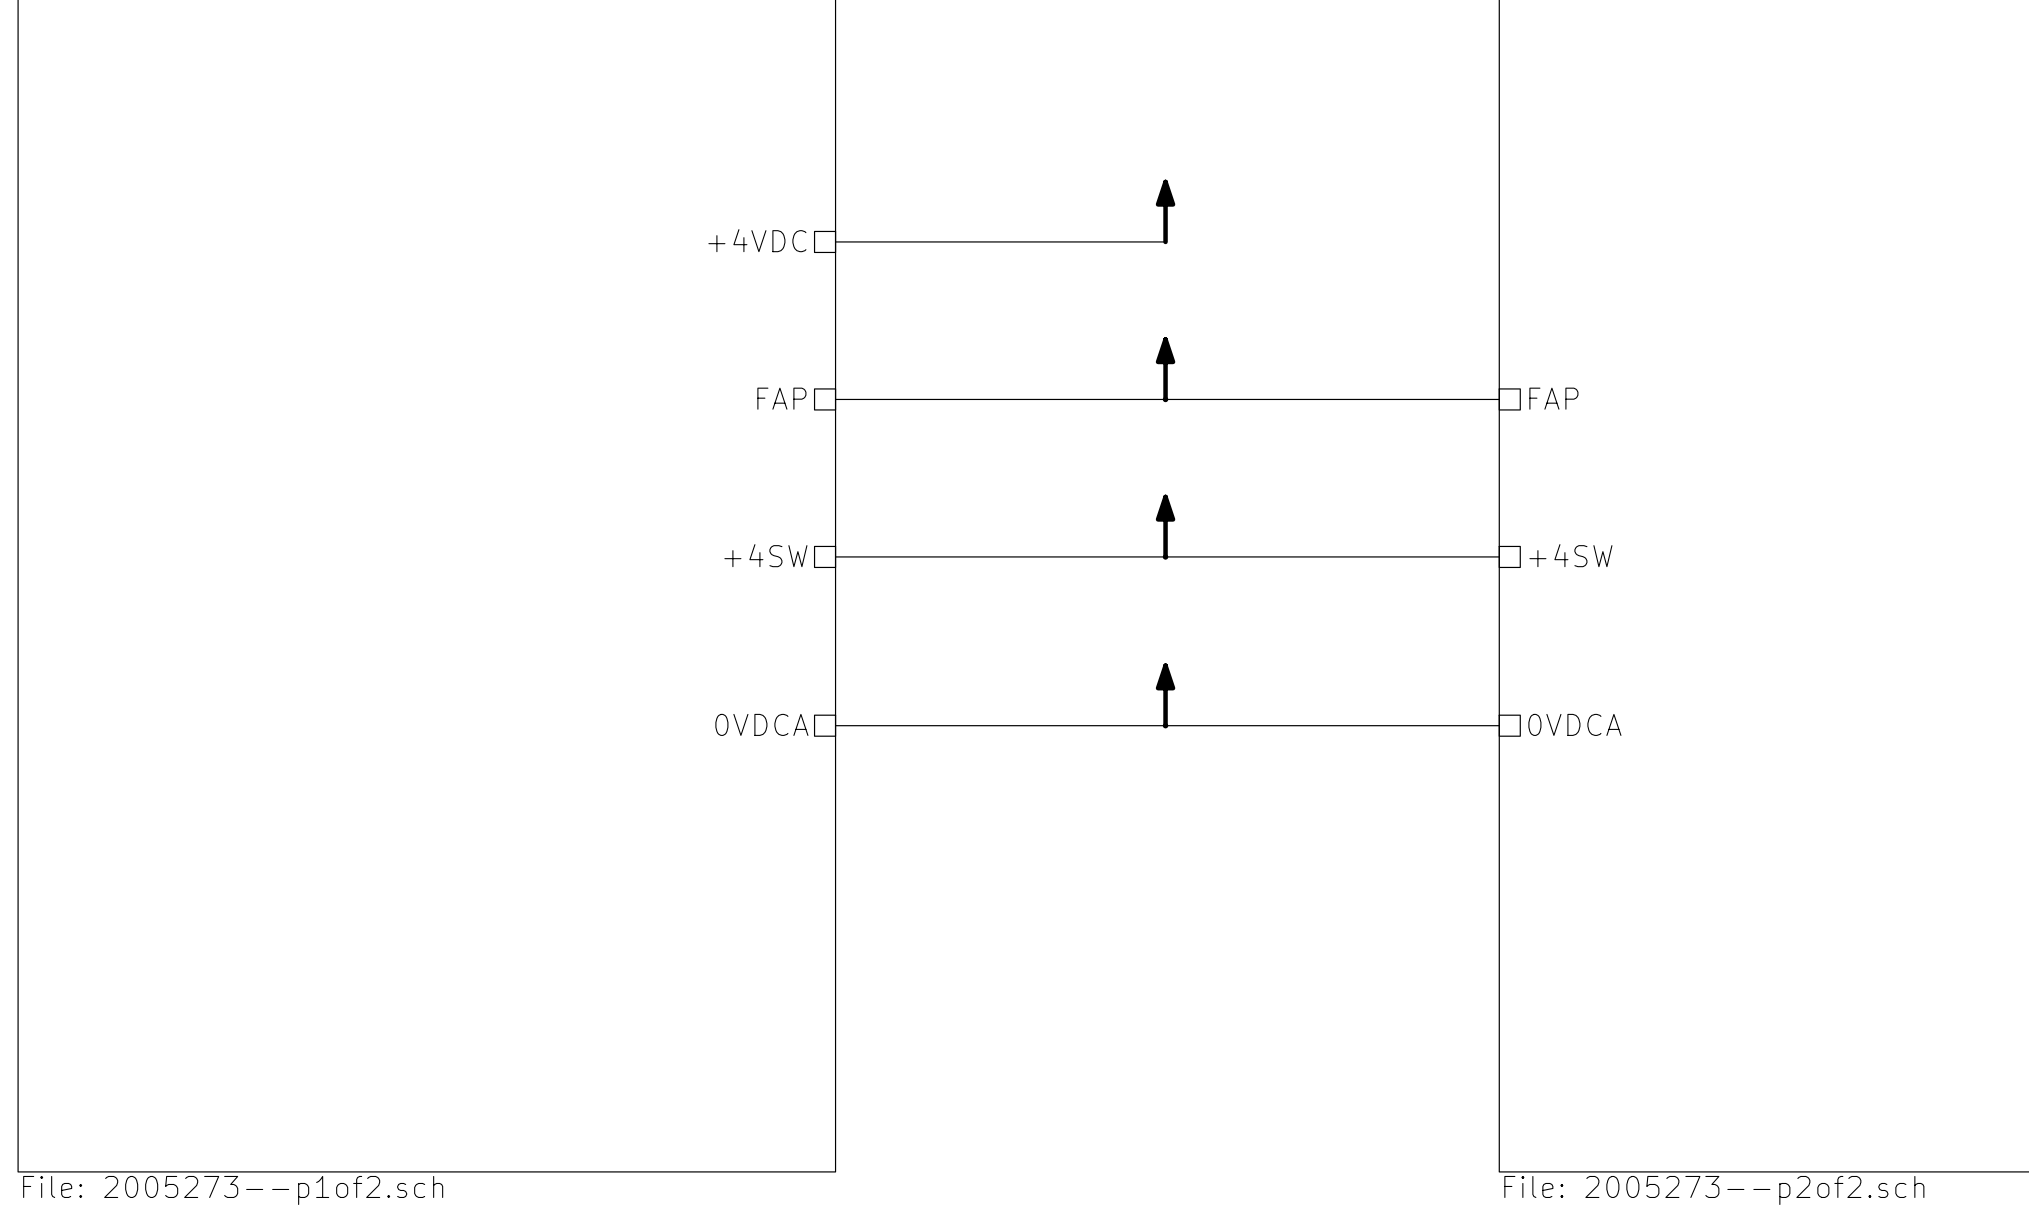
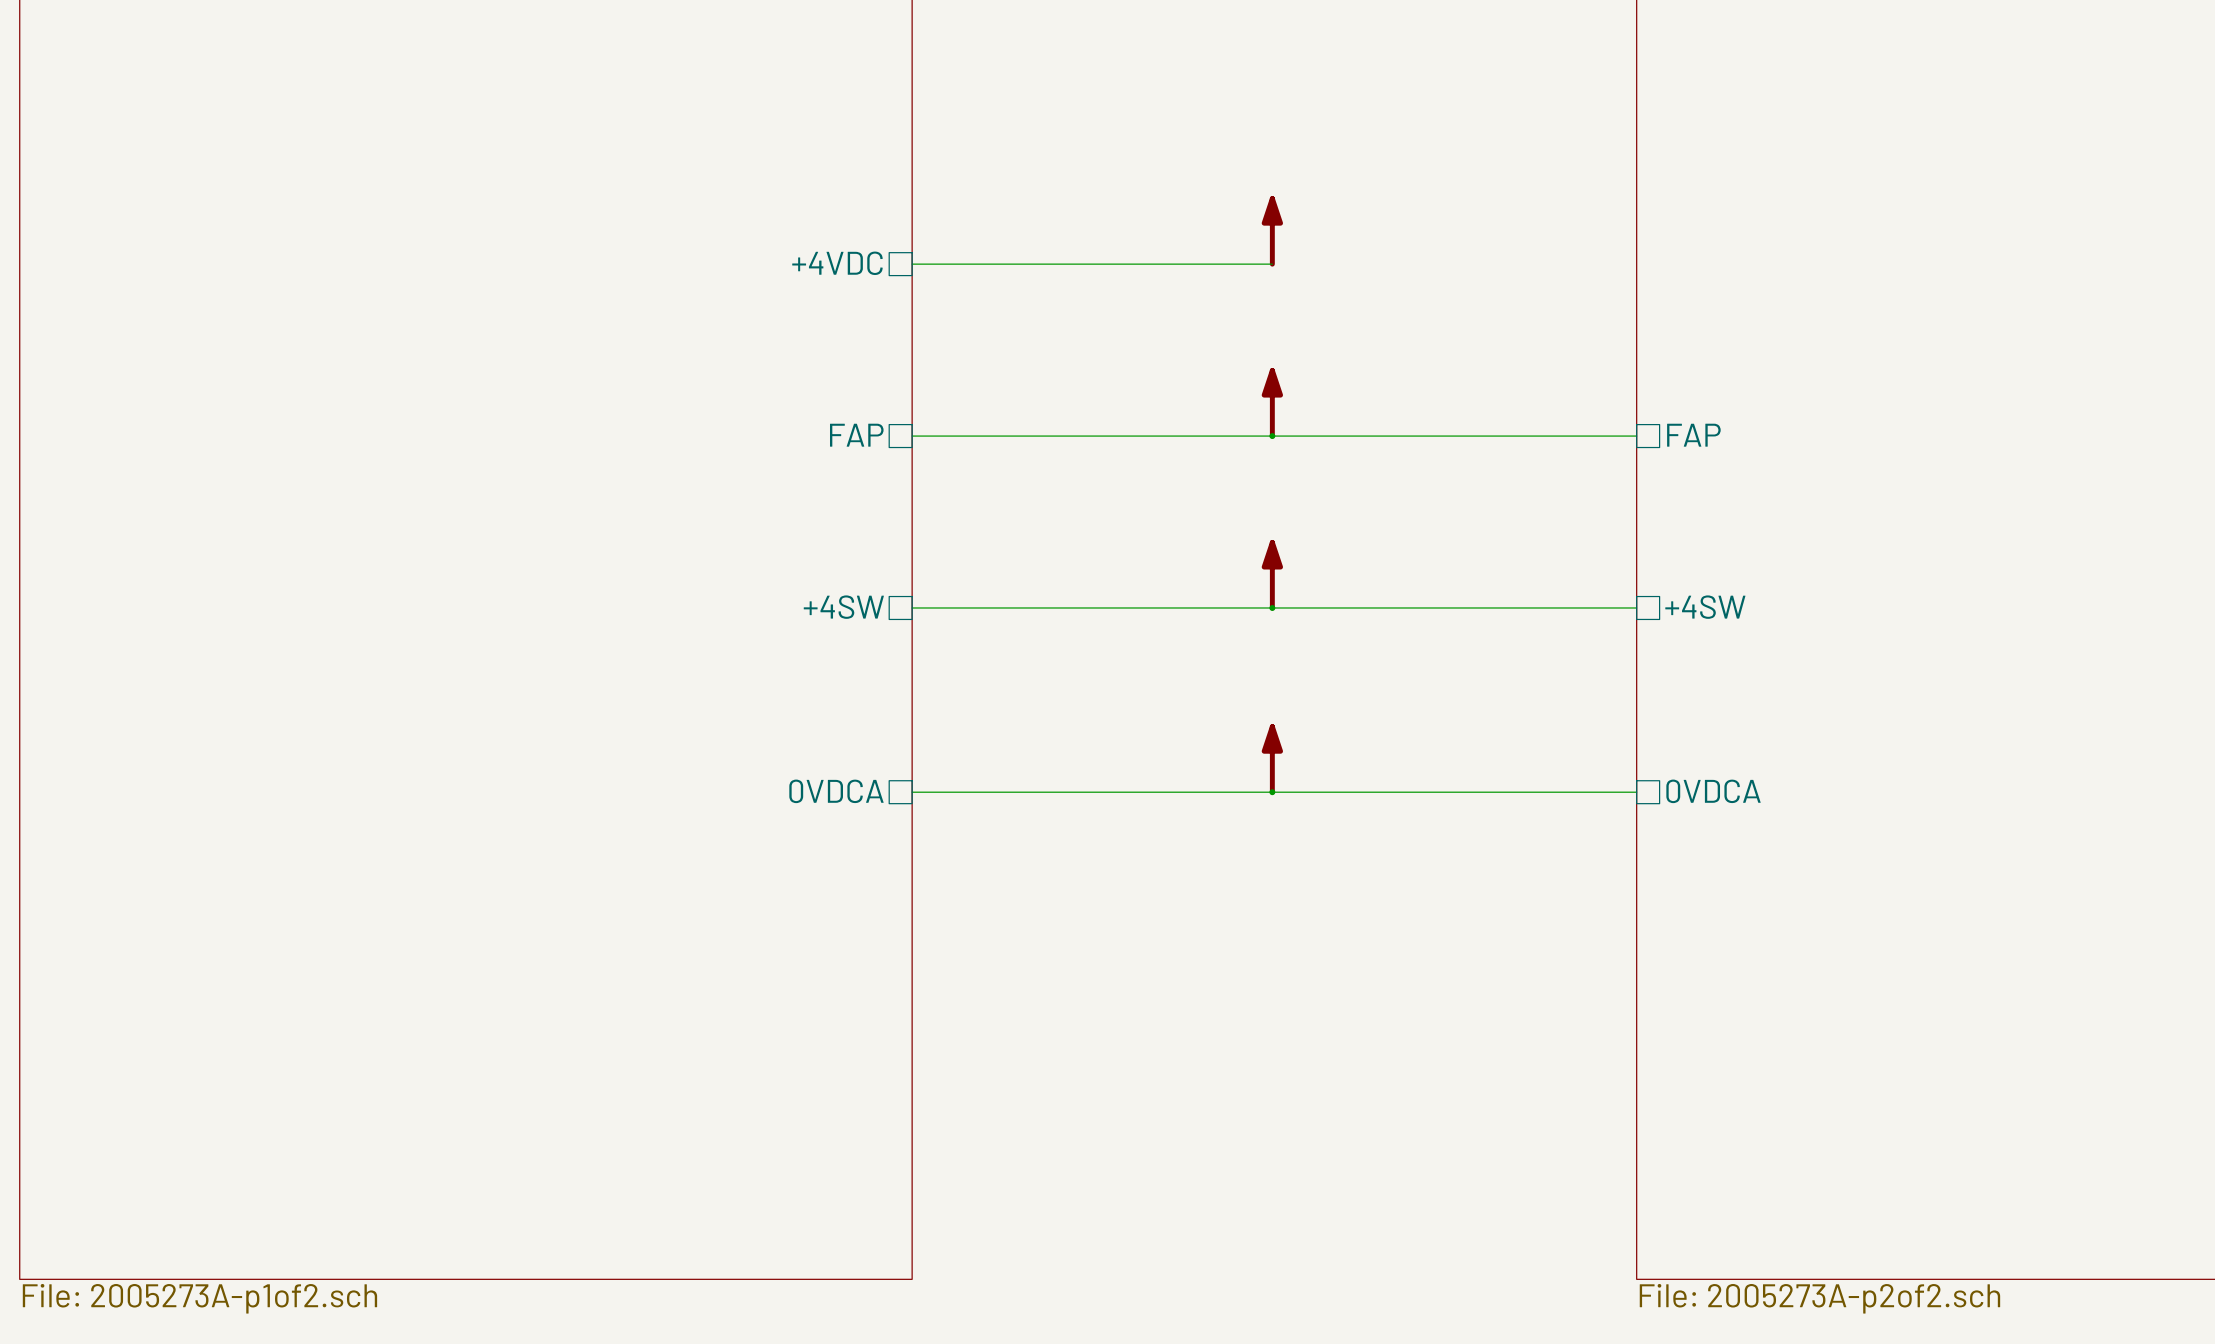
sheet value: File: 2005273--p1of2.sch (233, 1190) -> File: 2005273A-p1of2.sch (199, 1298)
sheet value: File: 2005273--p2of2.sch (1714, 1190) -> File: 2005273A-p2of2.sch (1819, 1298)

